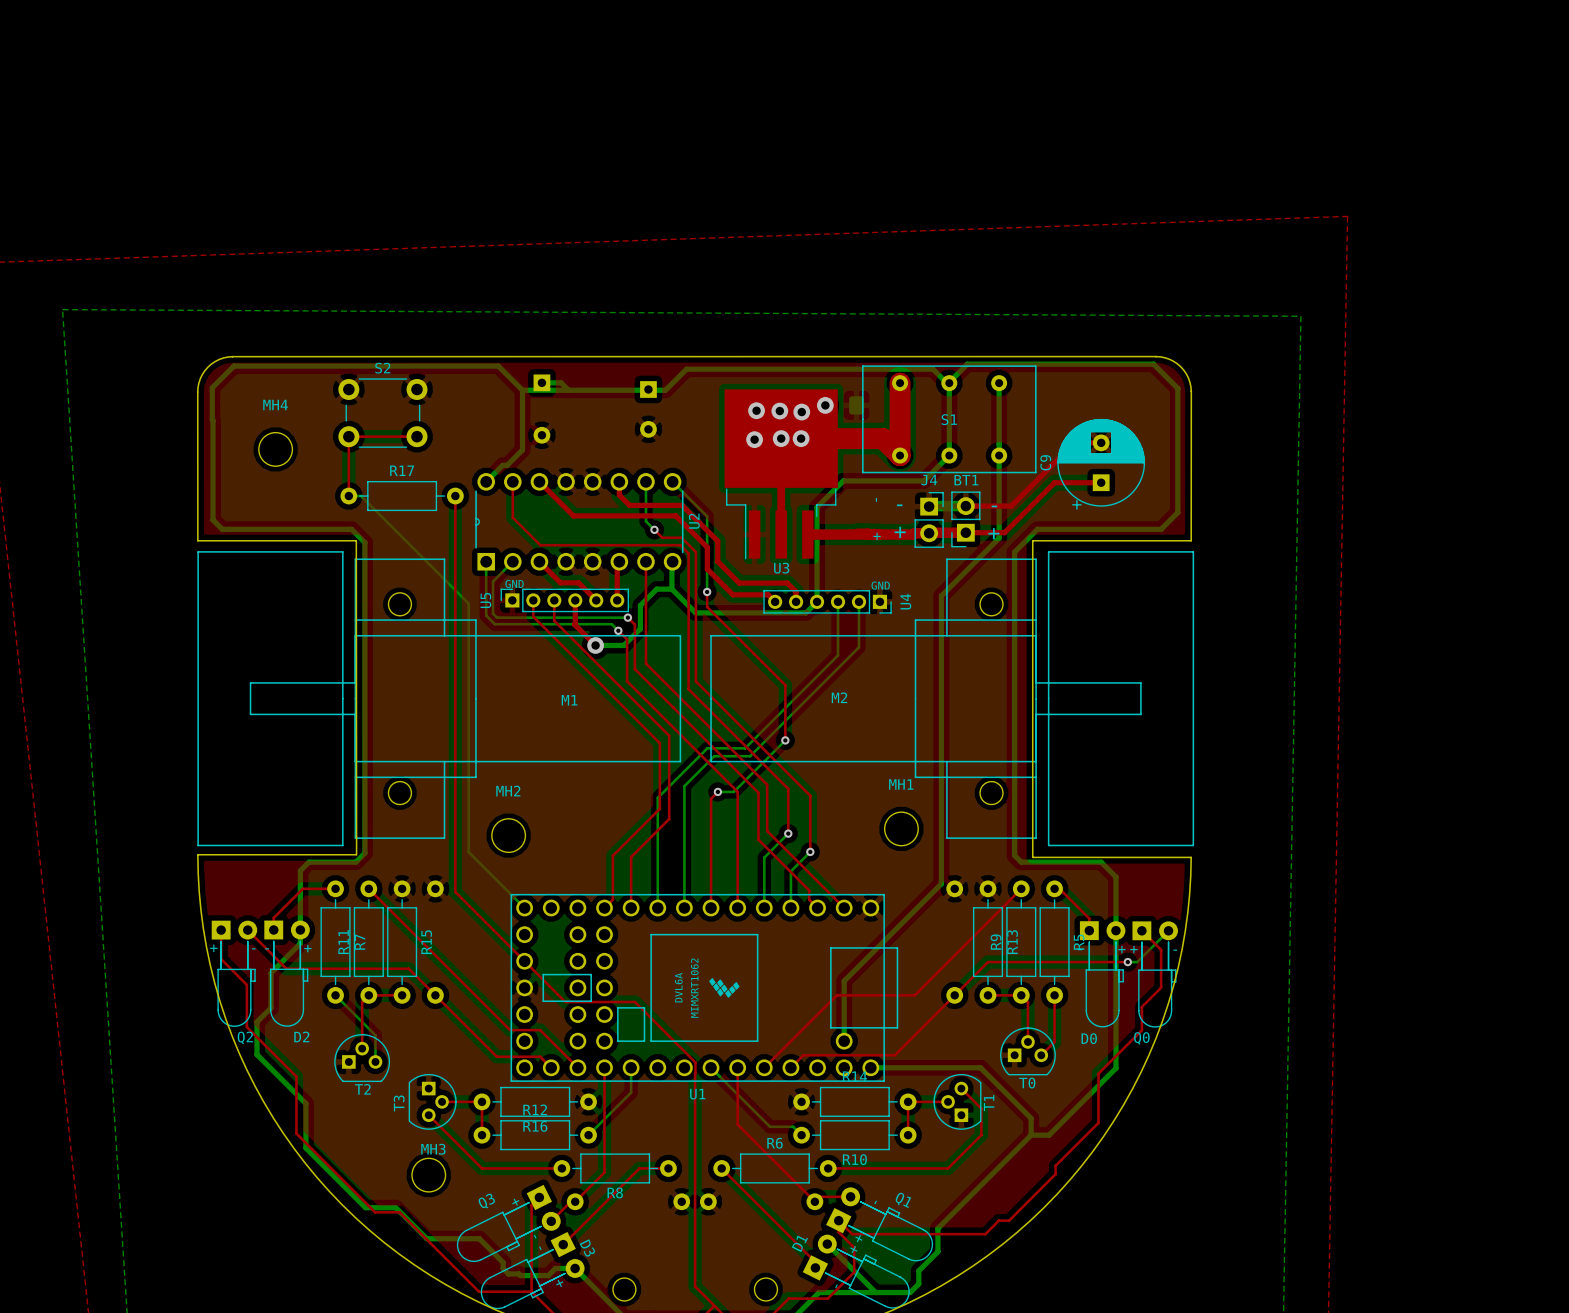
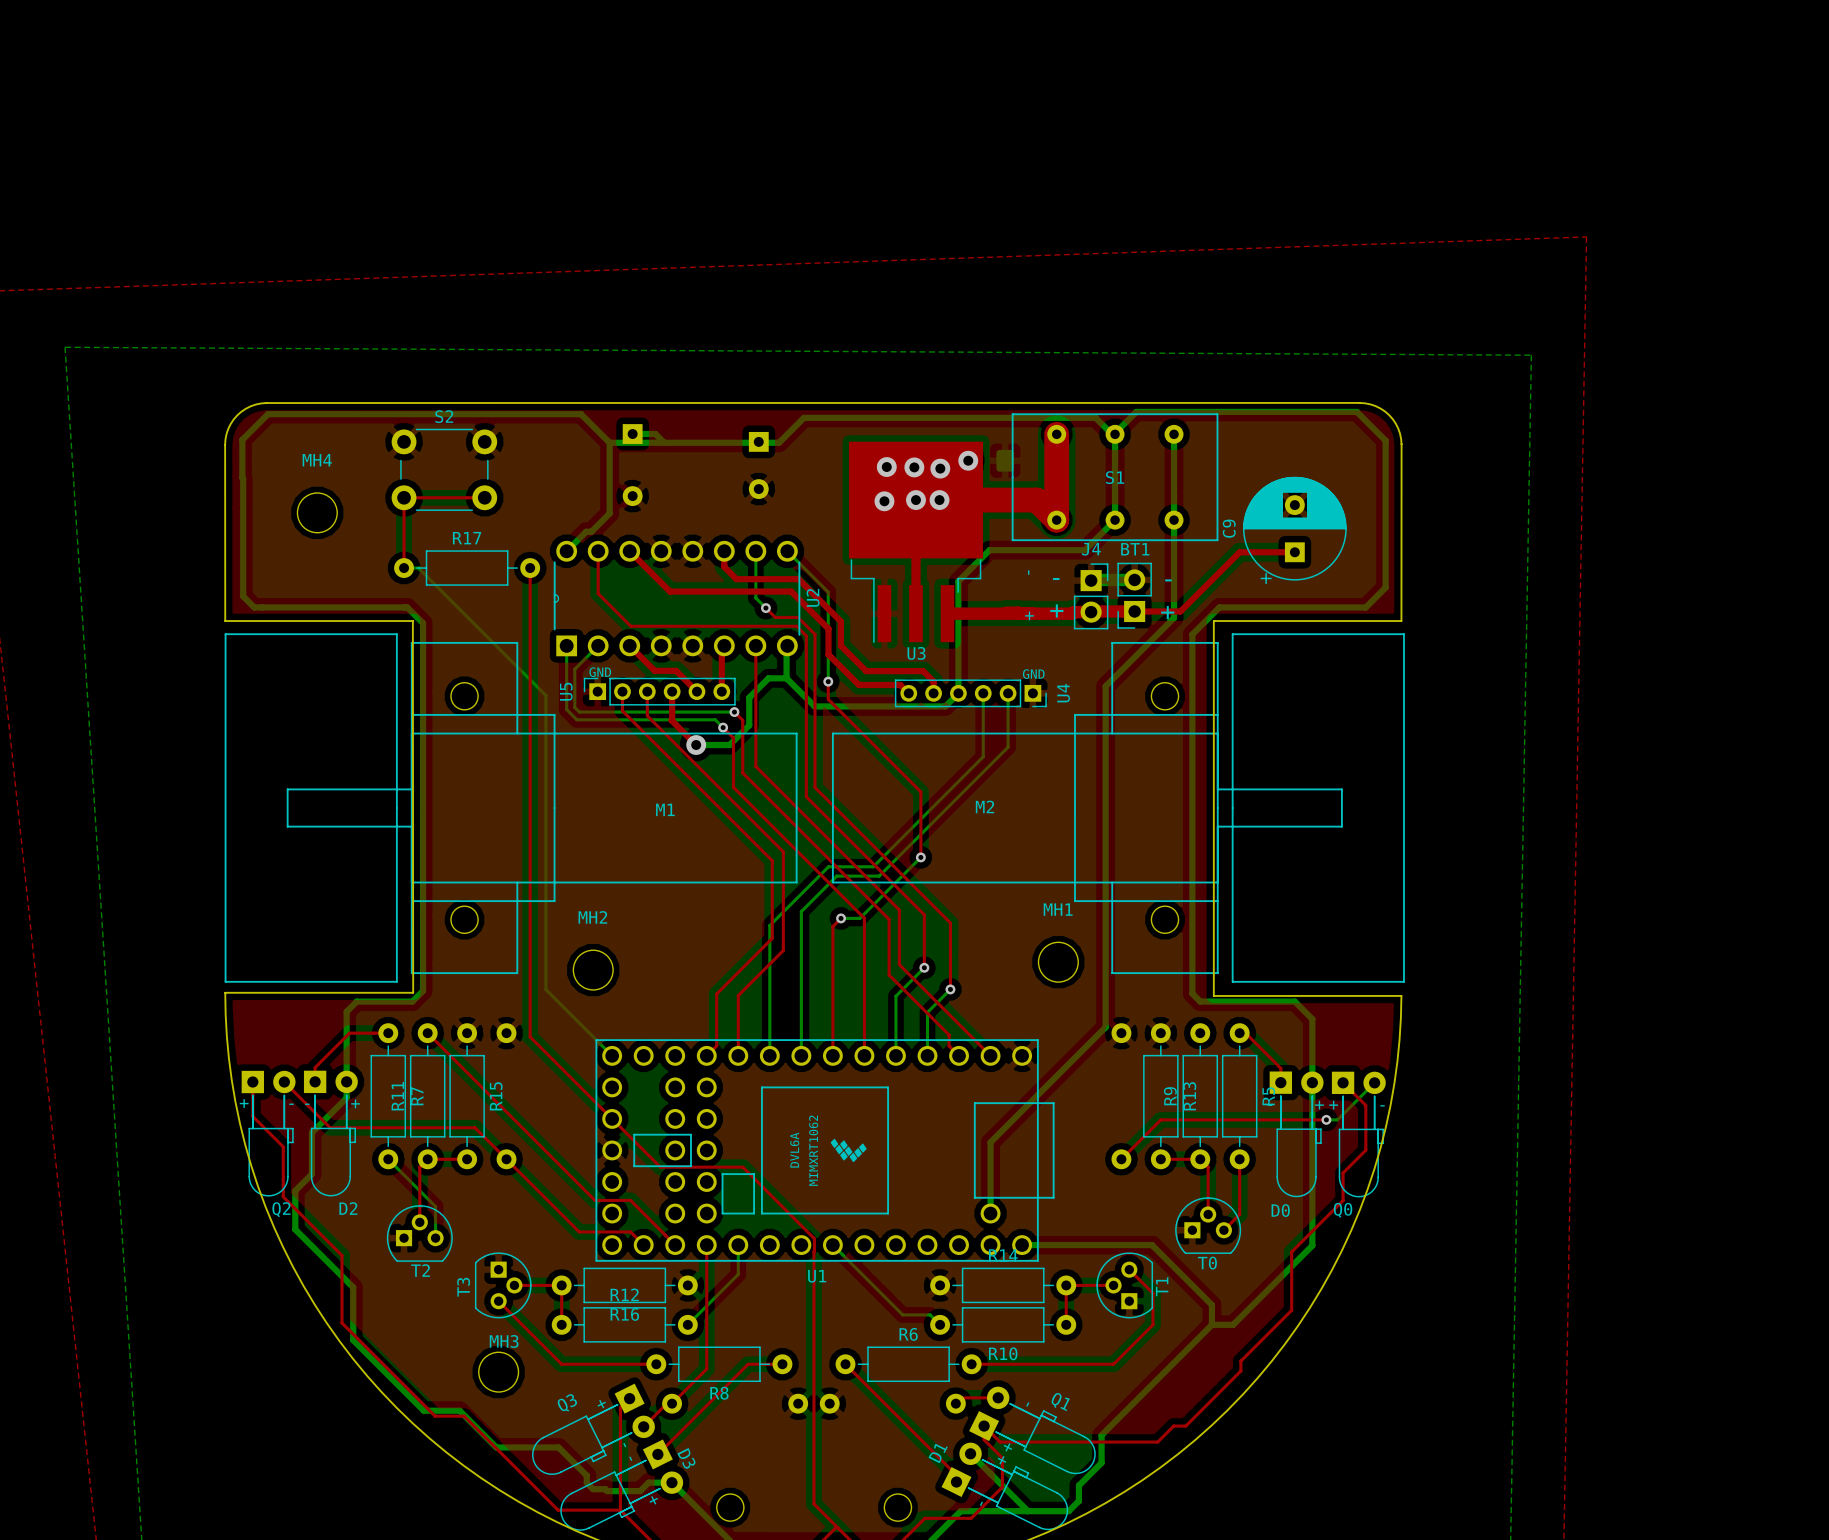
top track: (1101, 442) (1074, 442) (1011, 506) (965, 506) -> none
top track: (1021, 888) (914, 995) (836, 995) (764, 1067) -> none
top track: (954, 995) (894, 1055) (803, 1055) (790, 1067) -> none
top track: (737, 1067) (737, 1124) (814, 1201) -> none

